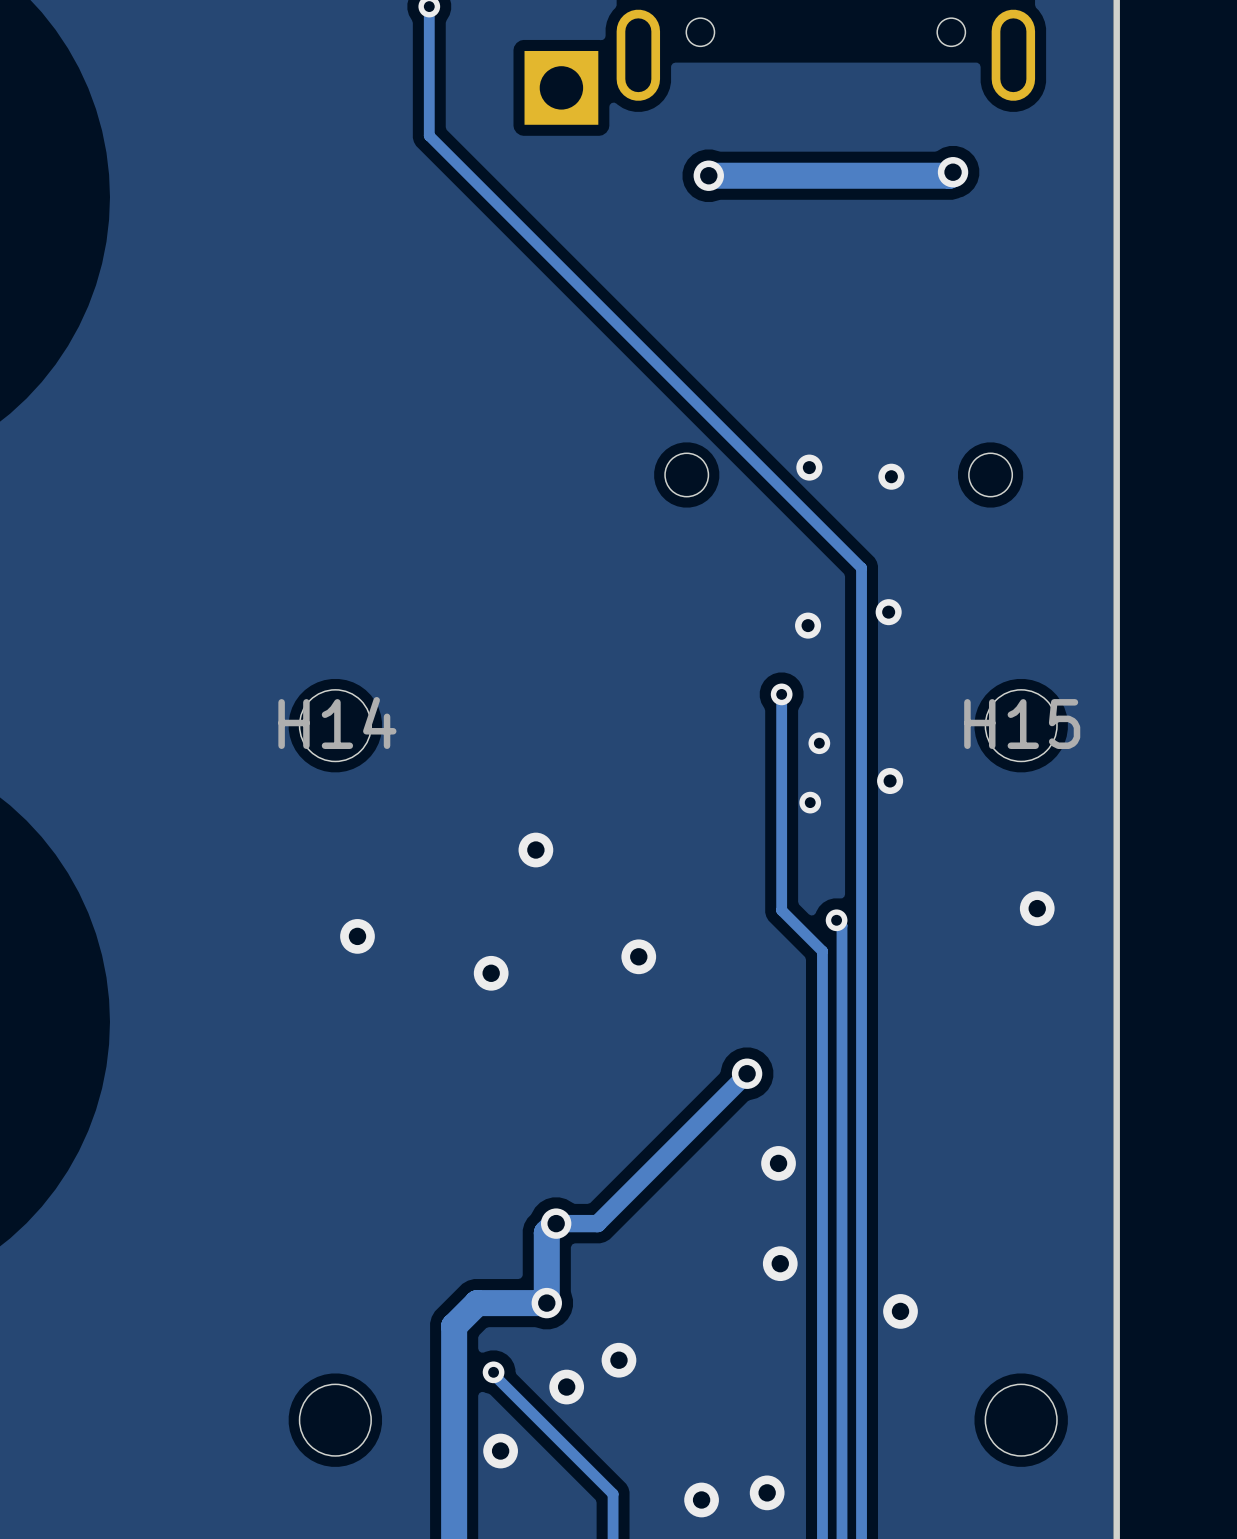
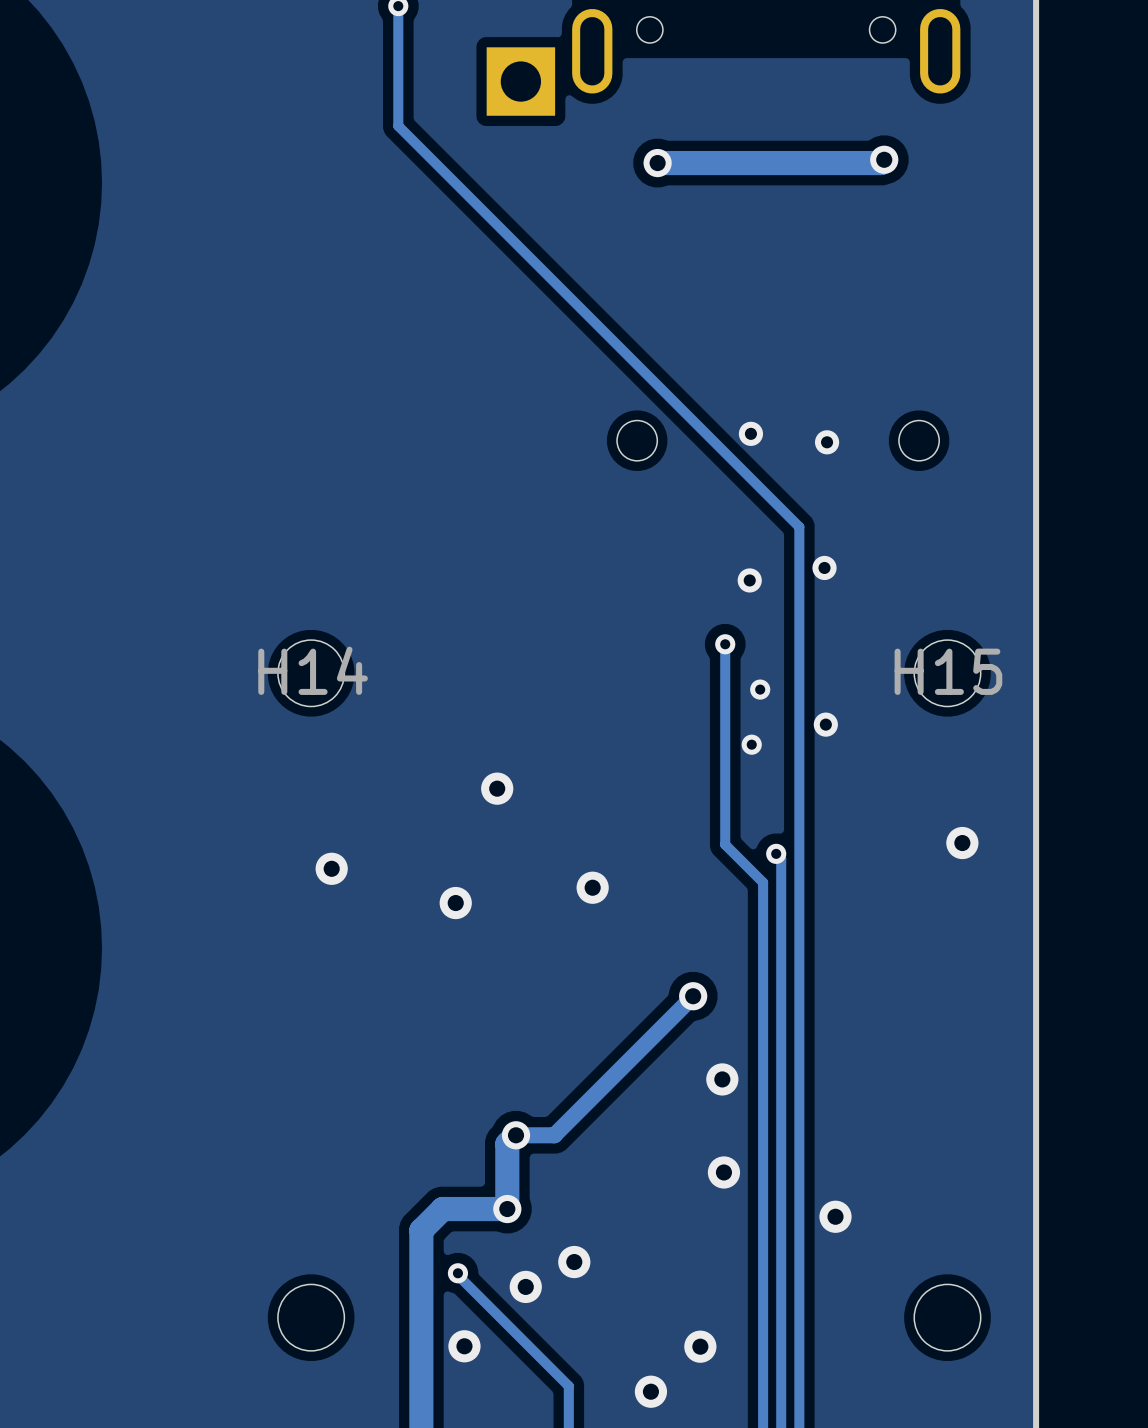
via position: (767, 1492) -> (700, 1346)

